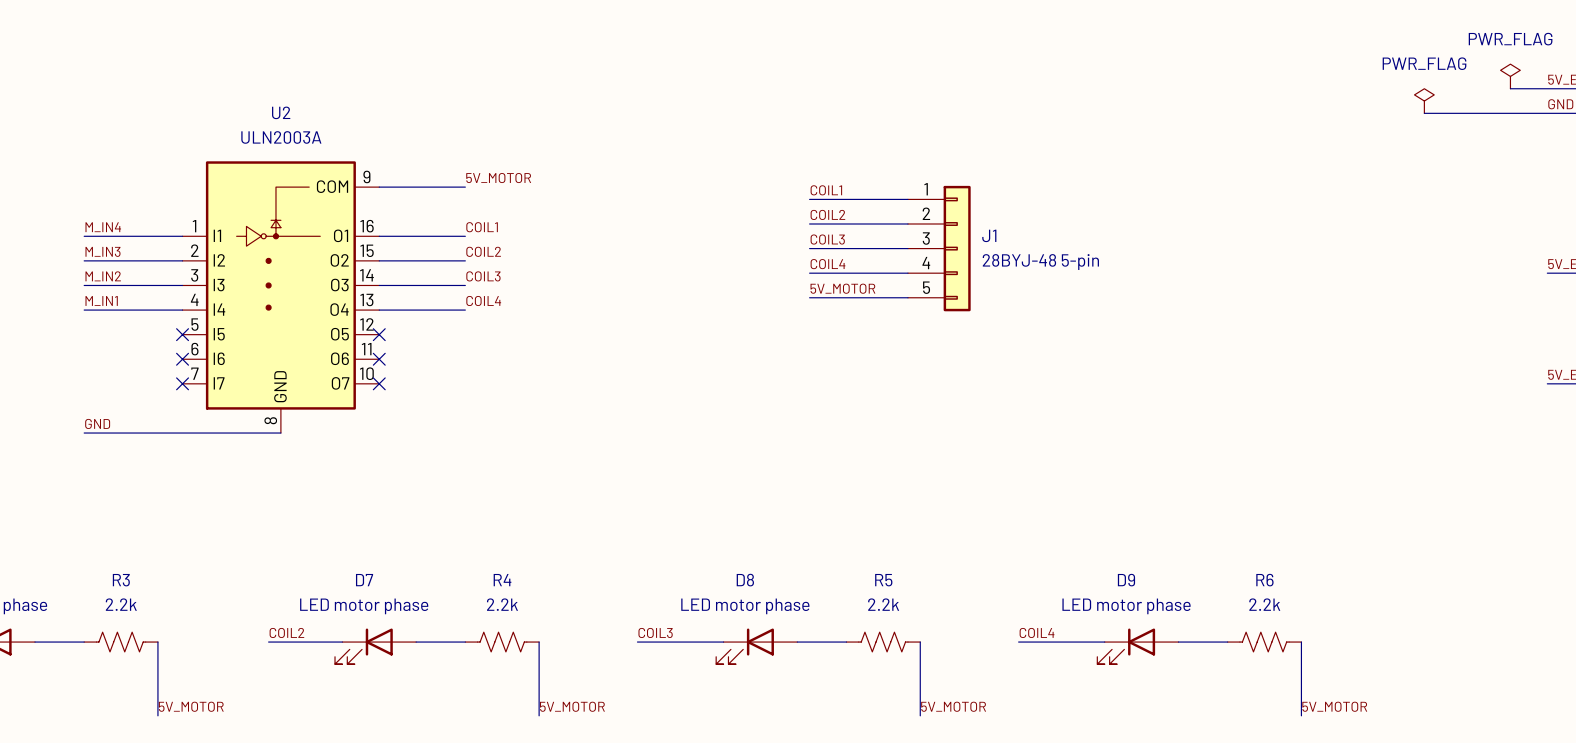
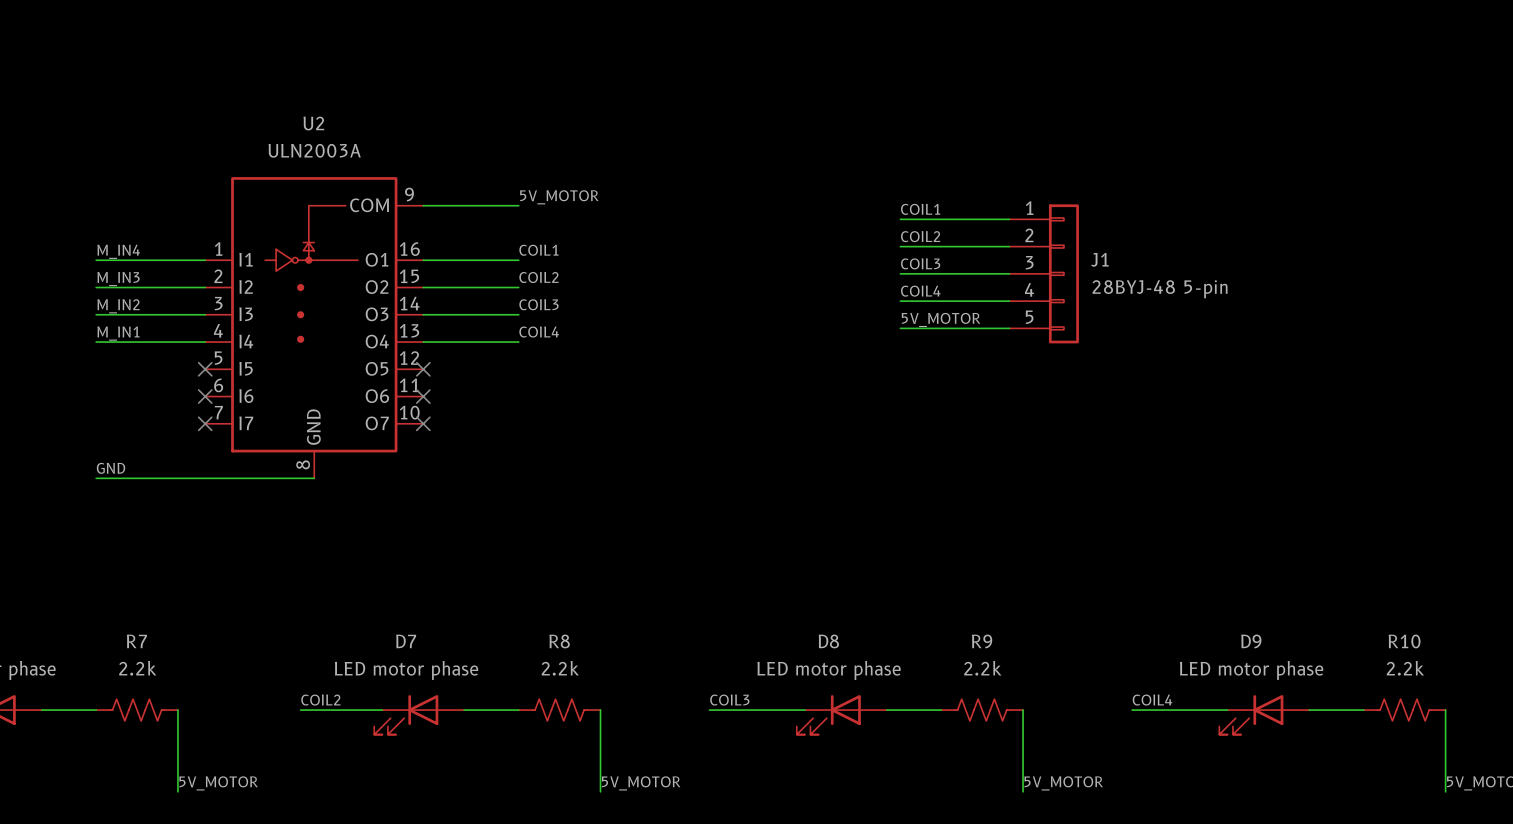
R3 name: R3 (121, 580) -> R7 (136, 641)
R4 name: R4 (502, 580) -> R8 (559, 641)
R5 name: R5 (883, 580) -> R9 (982, 641)
R6 name: R6 (1264, 580) -> R10 (1404, 641)

